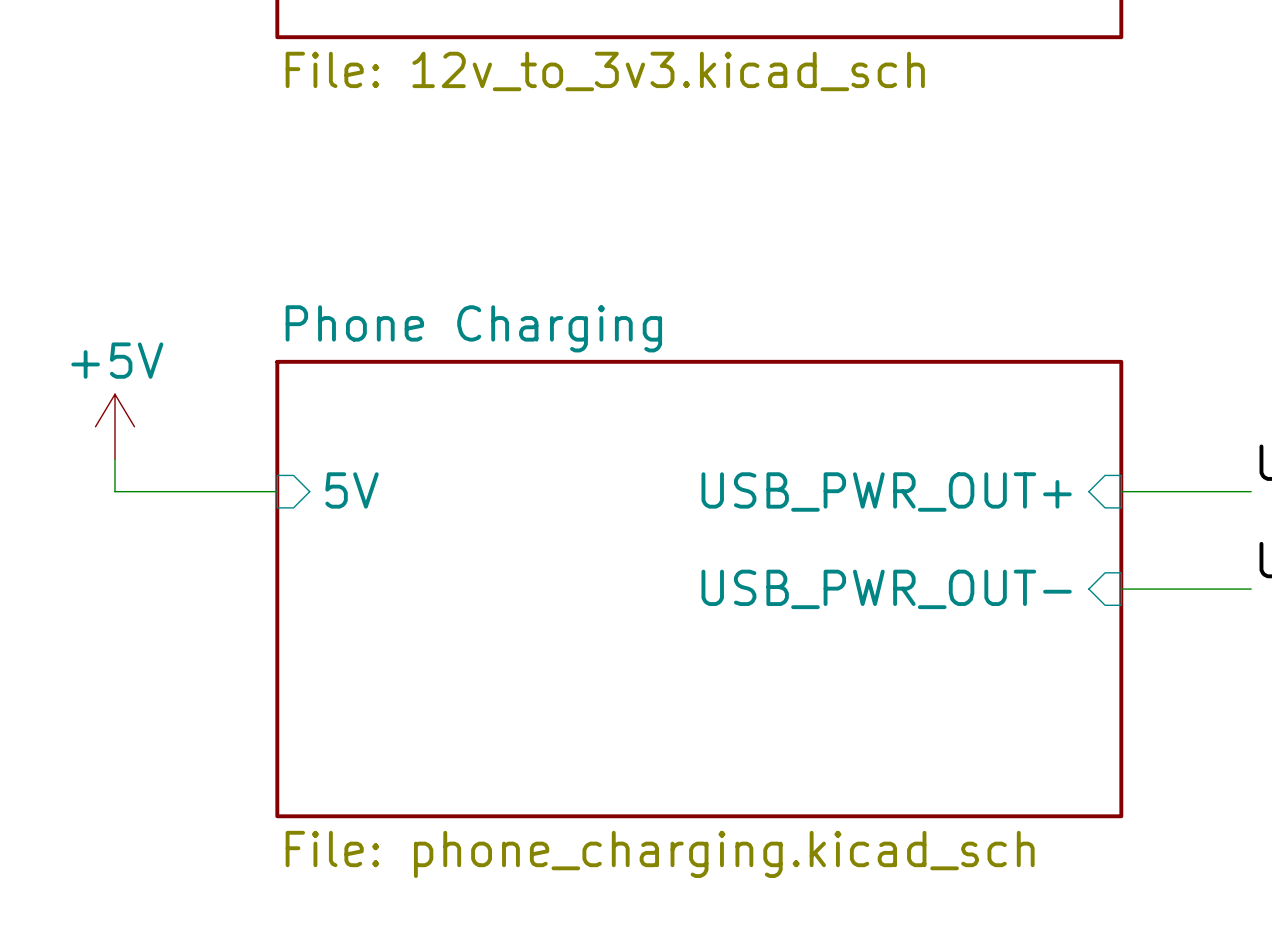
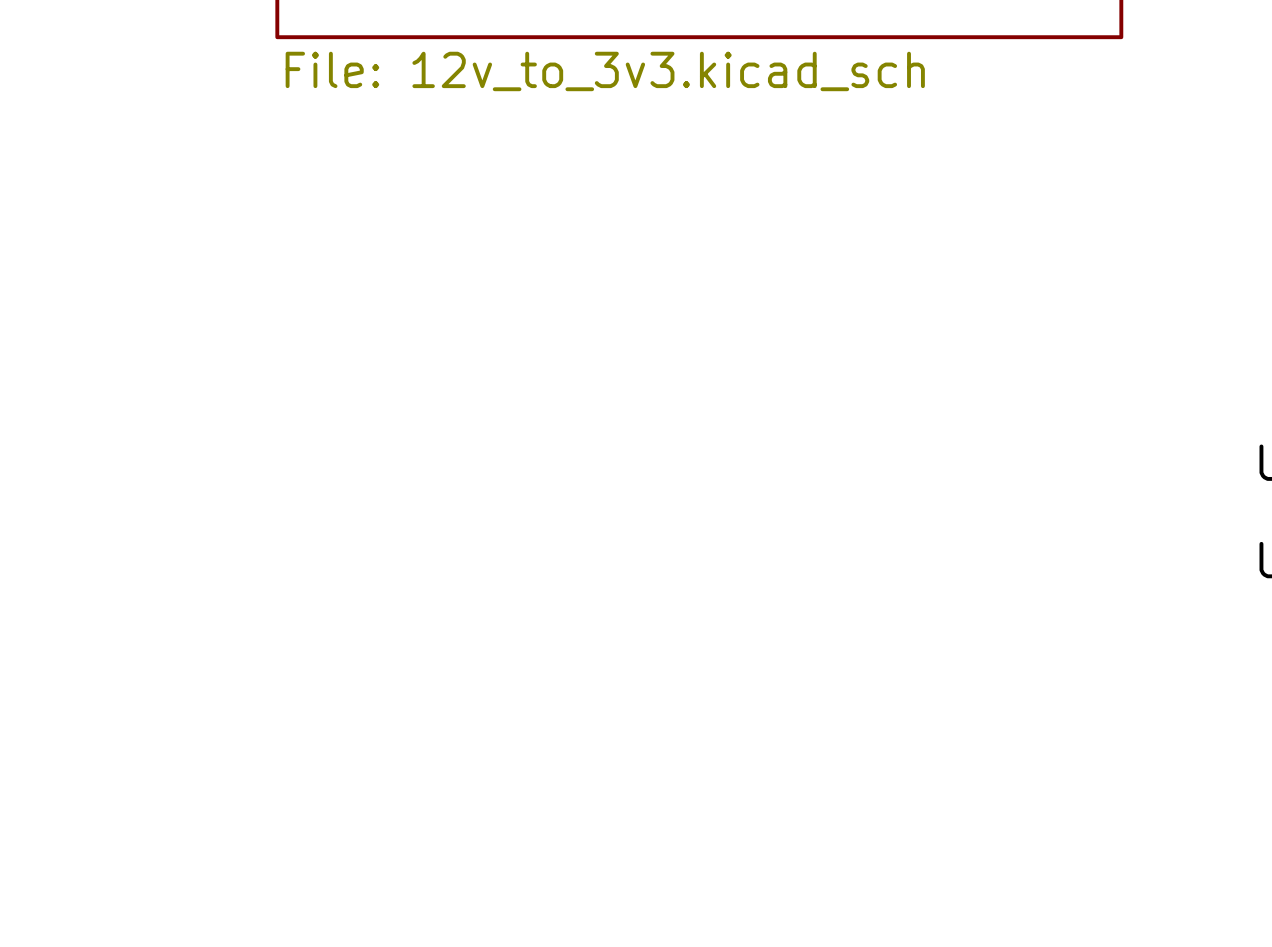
power symbol: +5V (114, 426) -> none
wire: (114, 459) (114, 491) (277, 491) -> none
sheet pin: 5V (352, 490) -> none
wire: (1121, 491) (1251, 491) -> none
sheet pin: USB_PWR_OUT+ (886, 492) -> none
sheet Phone Charging: File: phone_charging.kicad_sch (699, 589) -> none
sheet pin: USB_PWR_OUT- (886, 589) -> none
wire: (1121, 589) (1251, 589) -> none

